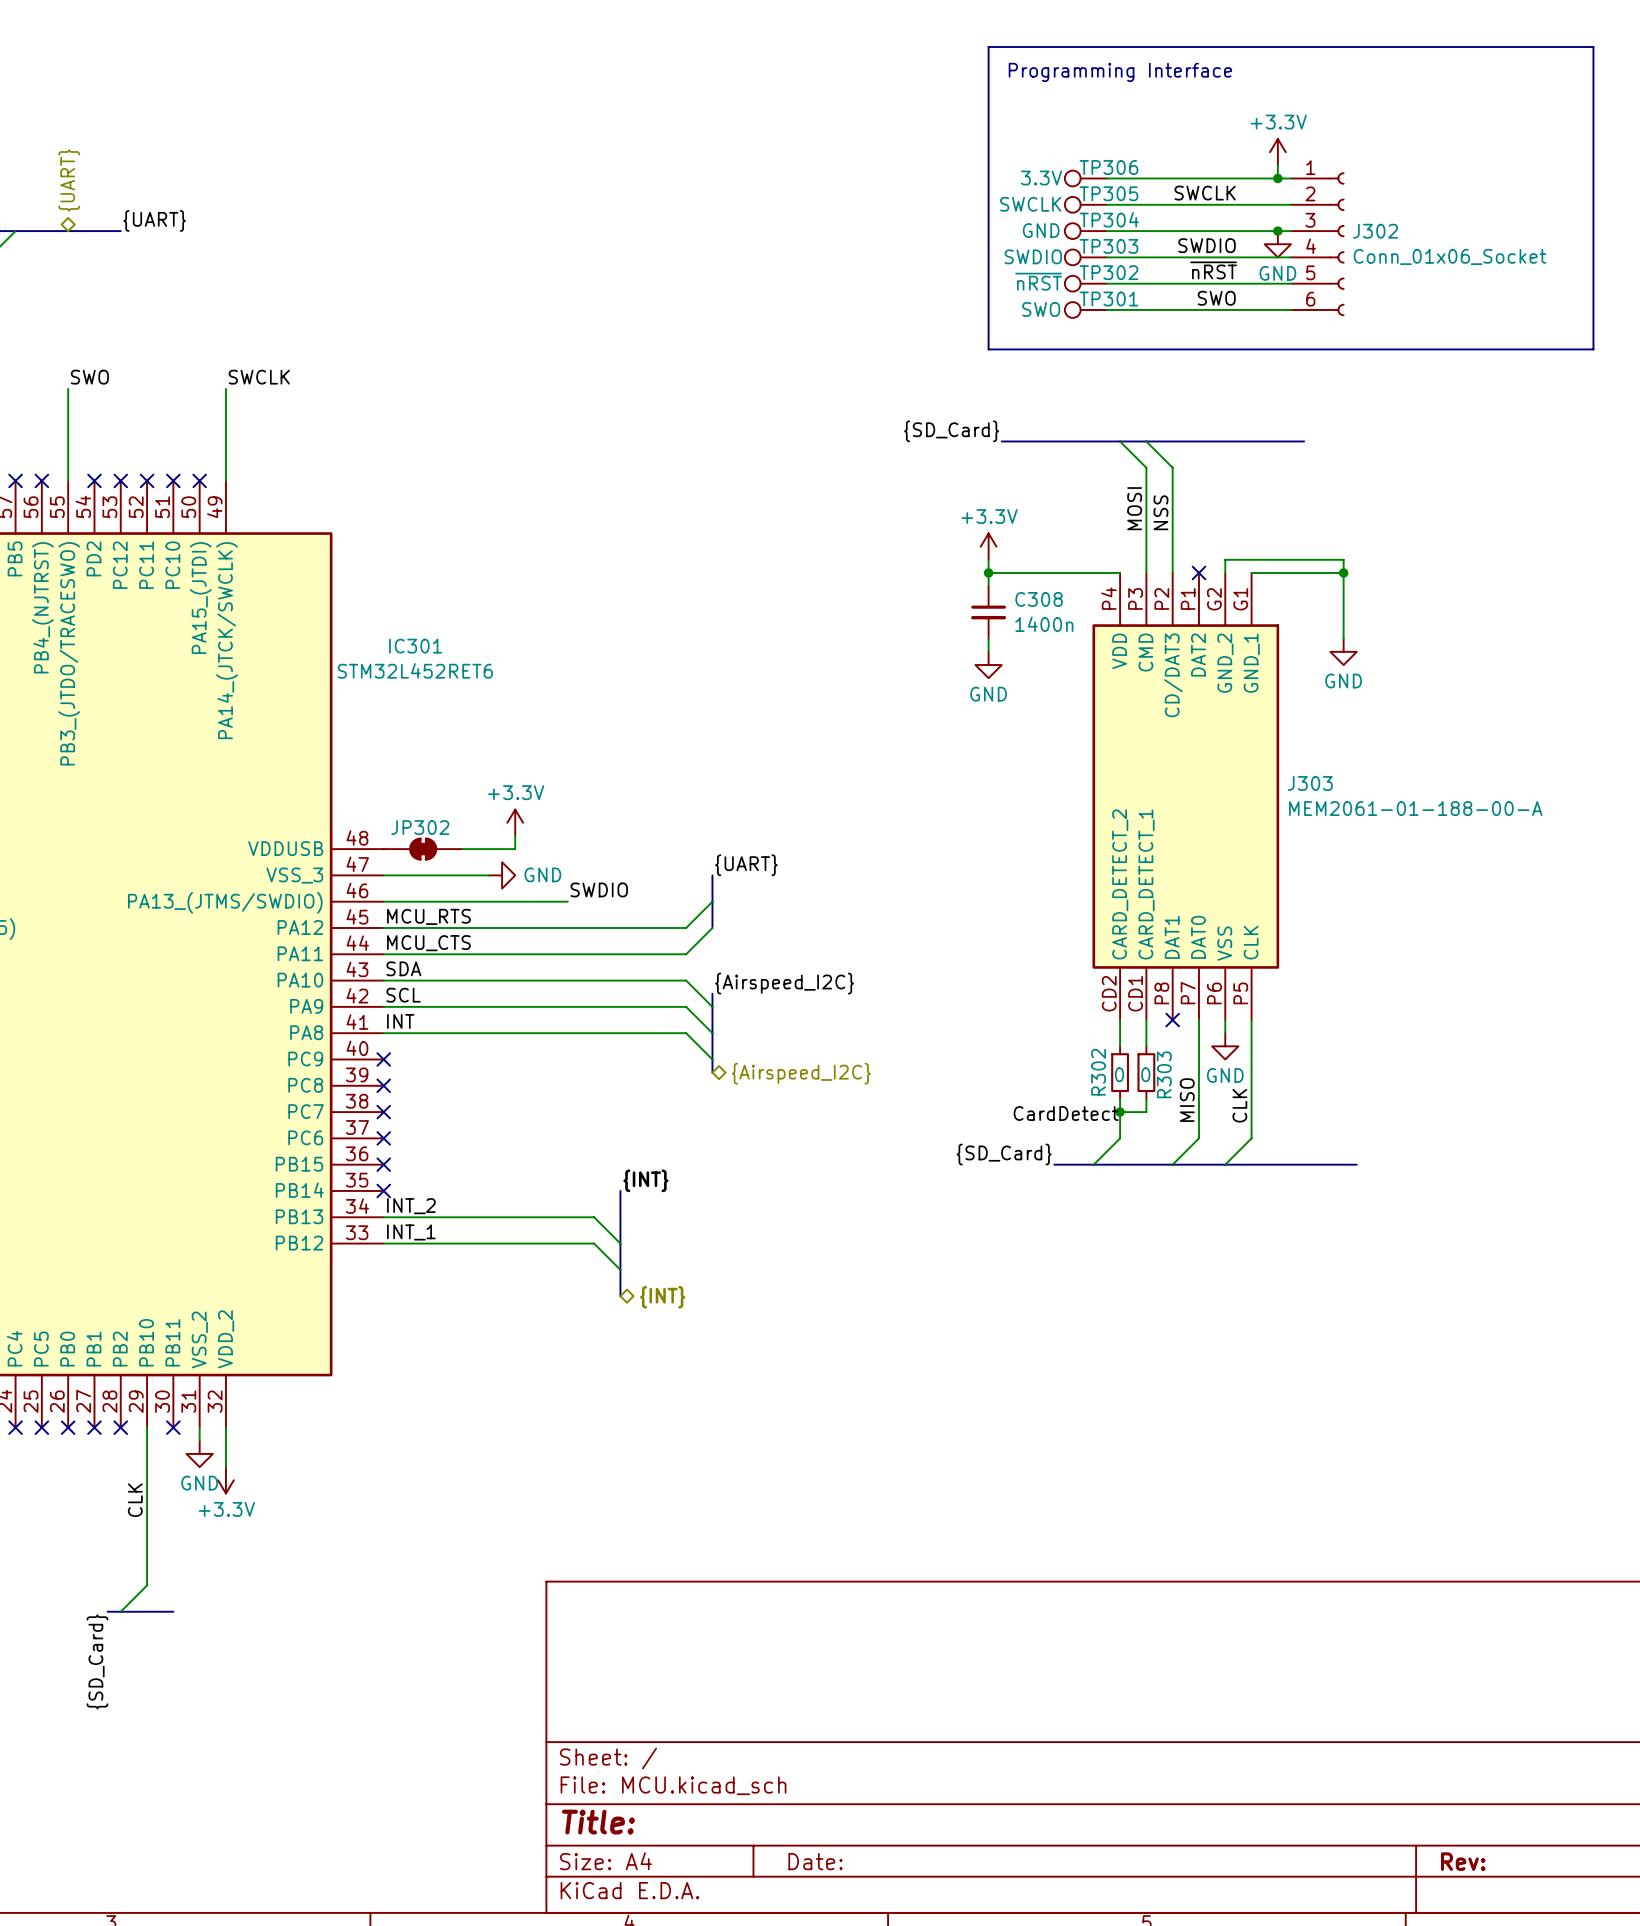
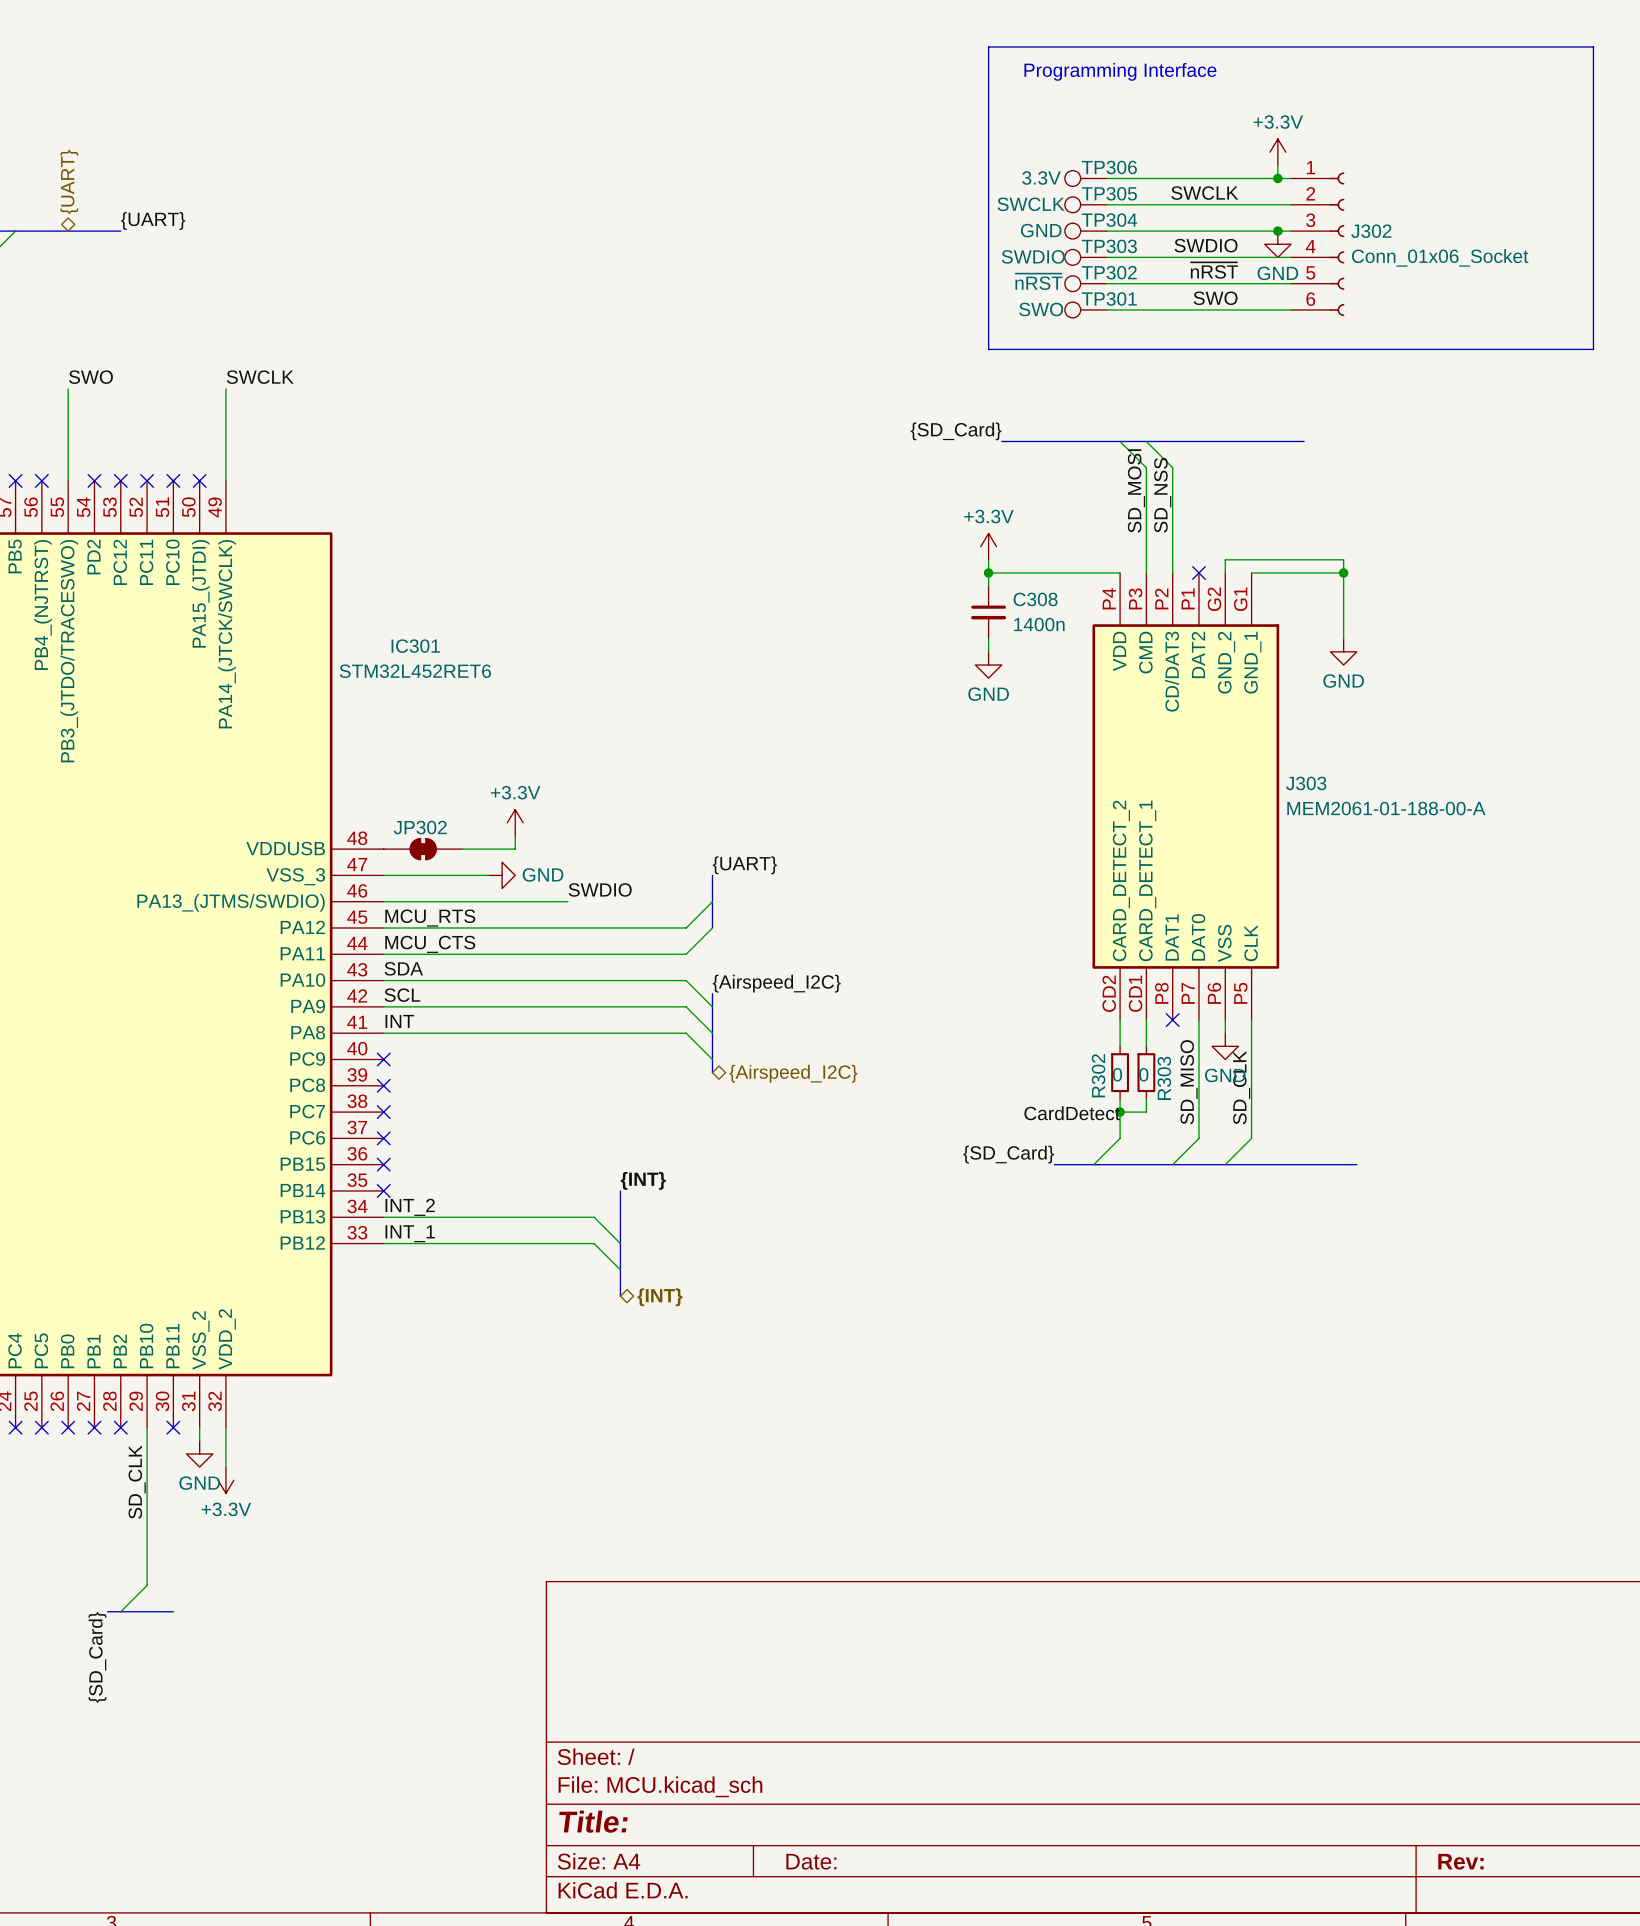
label: MOSI (1134, 508) -> SD_MOSI (1136, 490)
label: NSS (1160, 512) -> SD_NSS (1162, 495)
label: MISO (1187, 1100) -> SD_MISO (1189, 1082)
label: CLK (1239, 1105) -> SD_CLK (1241, 1087)
label: CLK (135, 1500) -> SD_CLK (137, 1482)

